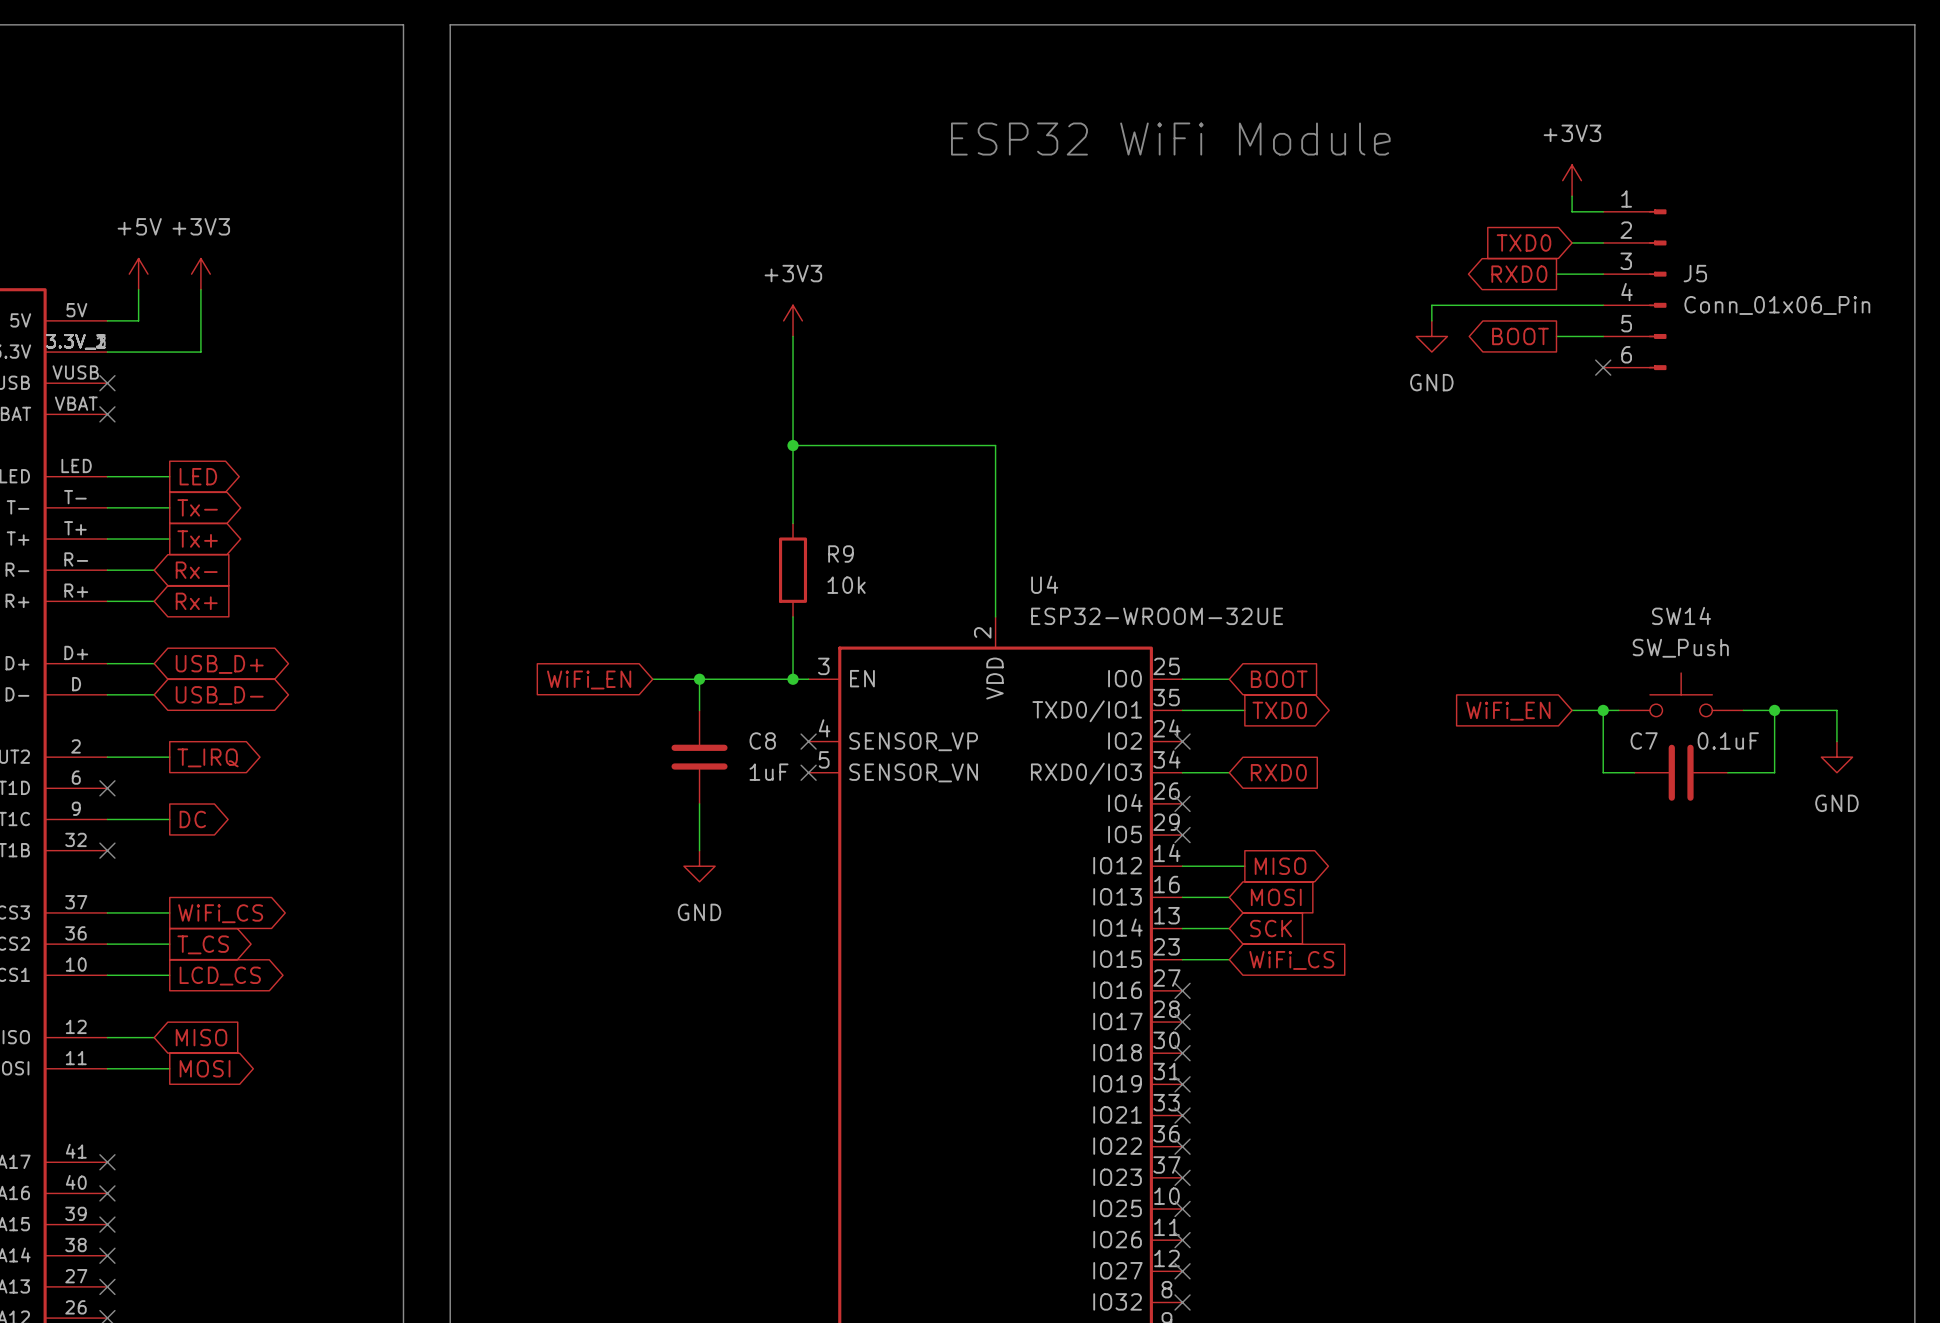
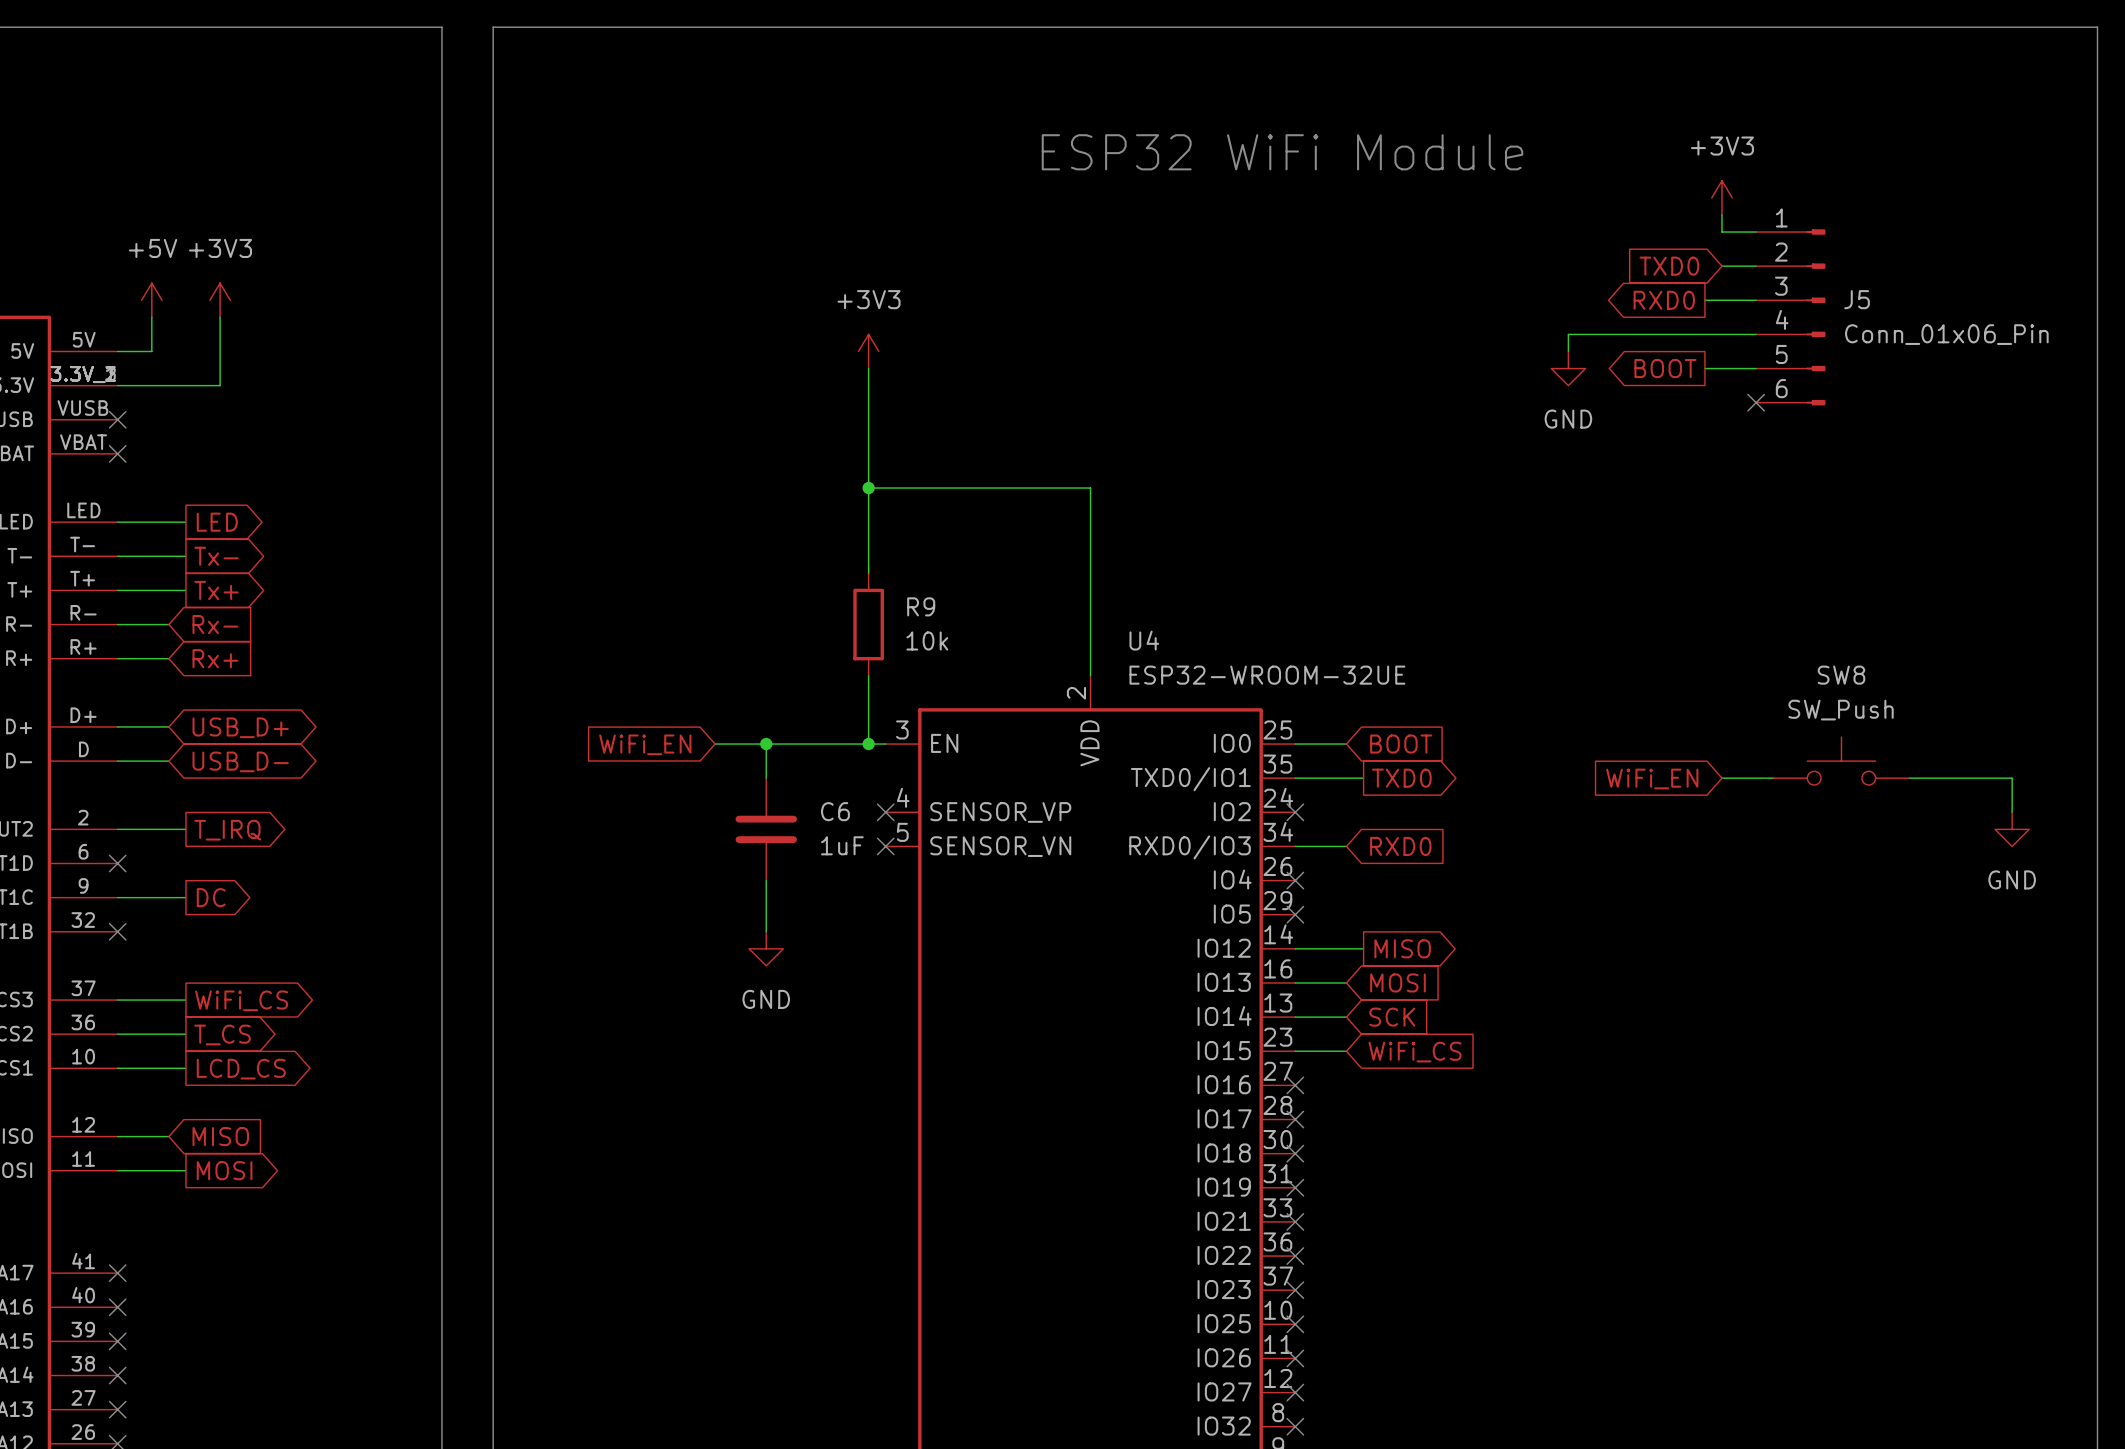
SW14 name: SW14 (1681, 615) -> SW8 (1841, 675)
wire: (1603, 710) (1603, 772) (1634, 772) -> none
junction: (1603, 710) -> none
wire: (1774, 710) (1774, 772) (1727, 772) -> none
junction: (1774, 710) -> none
C8 name: C8 (762, 740) -> C6 (835, 811)
C7: 0.1uF (1681, 772) -> none

